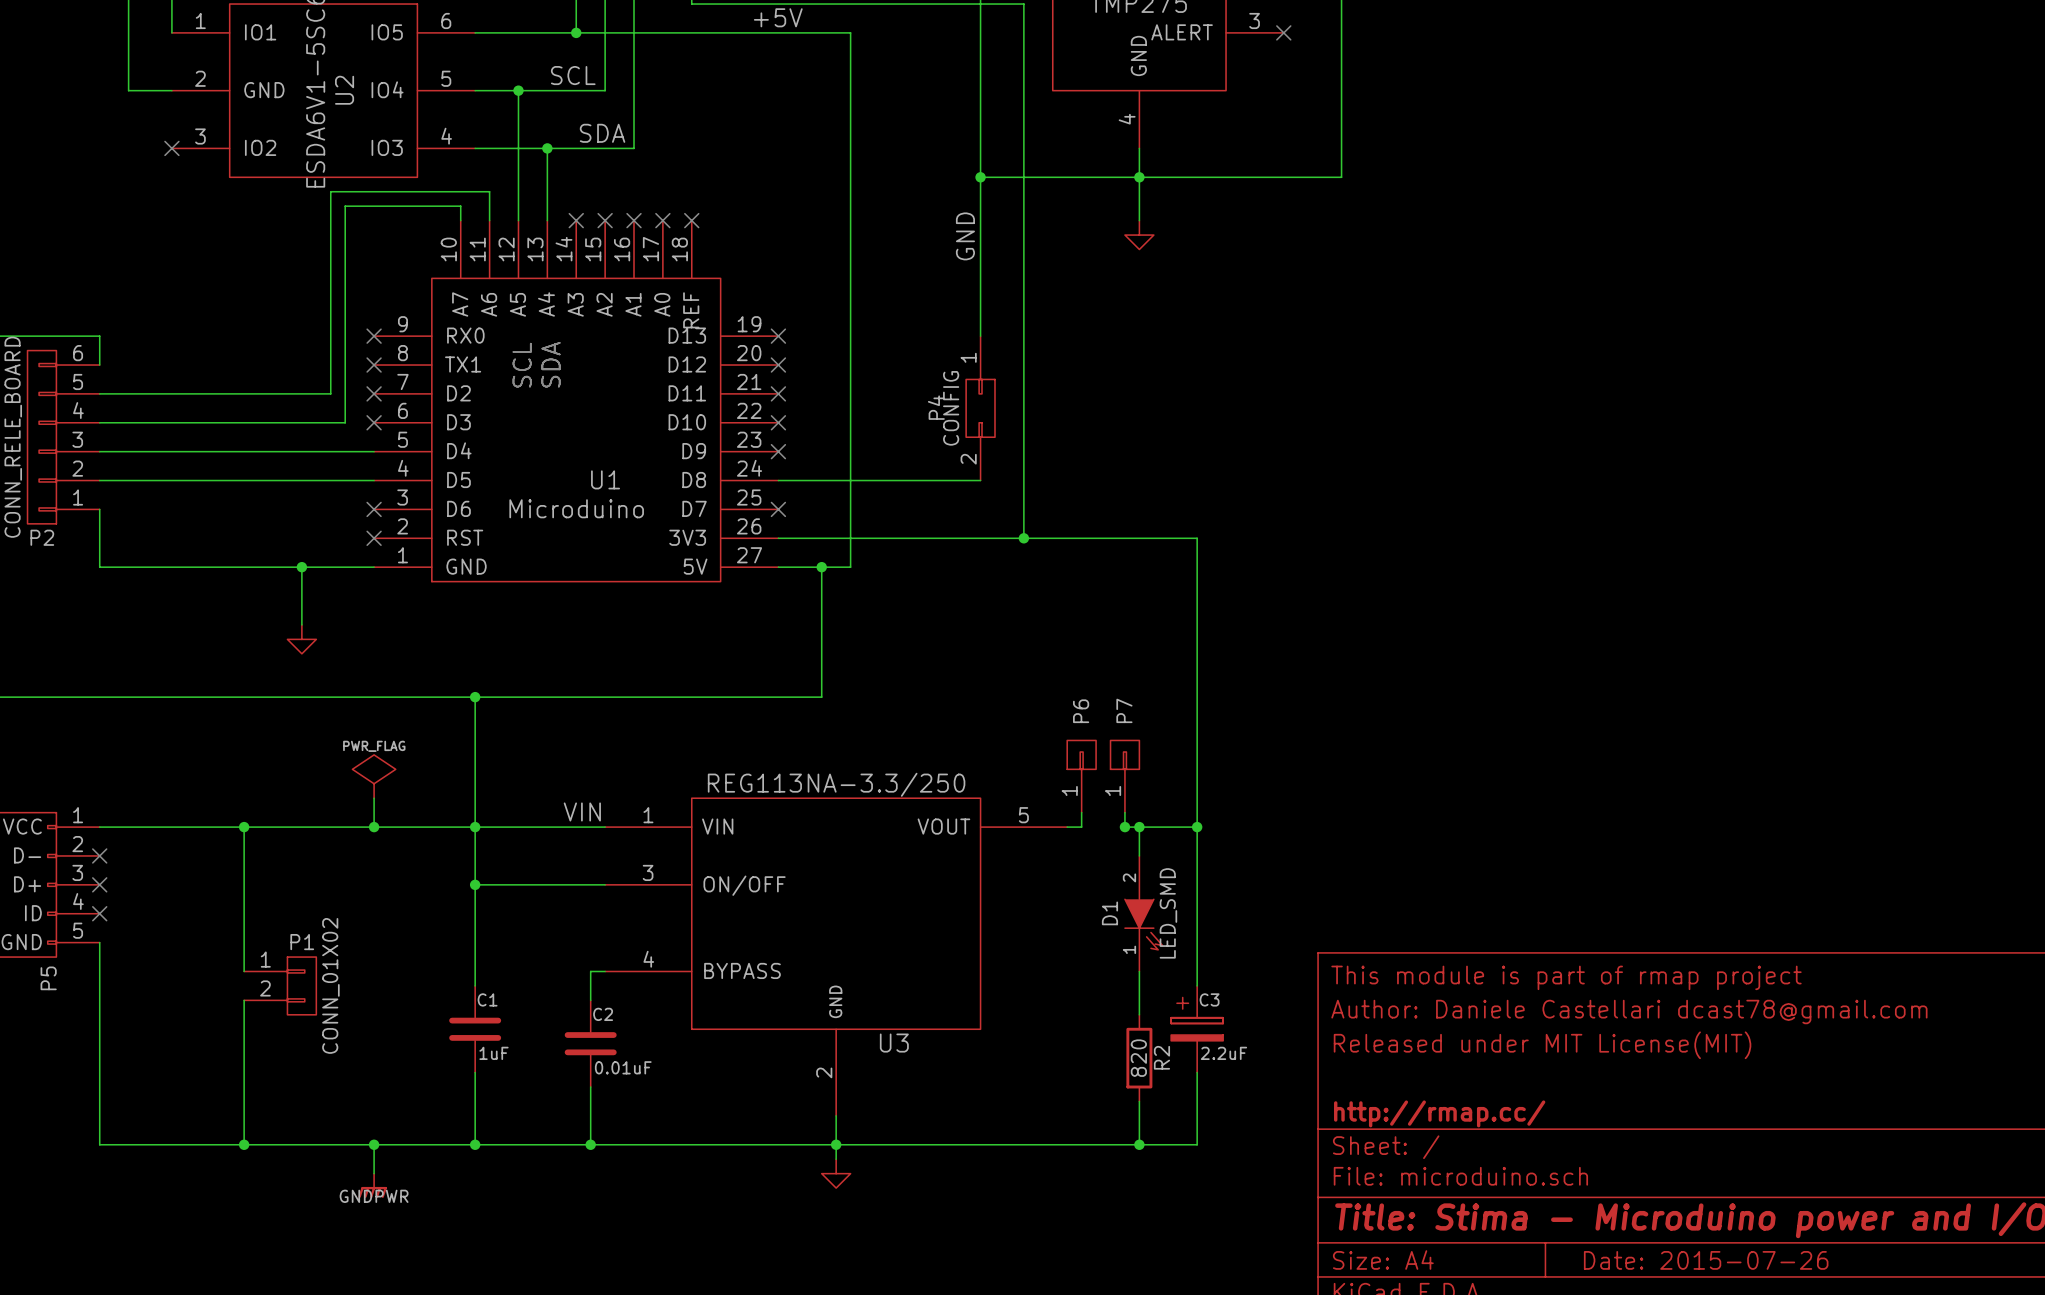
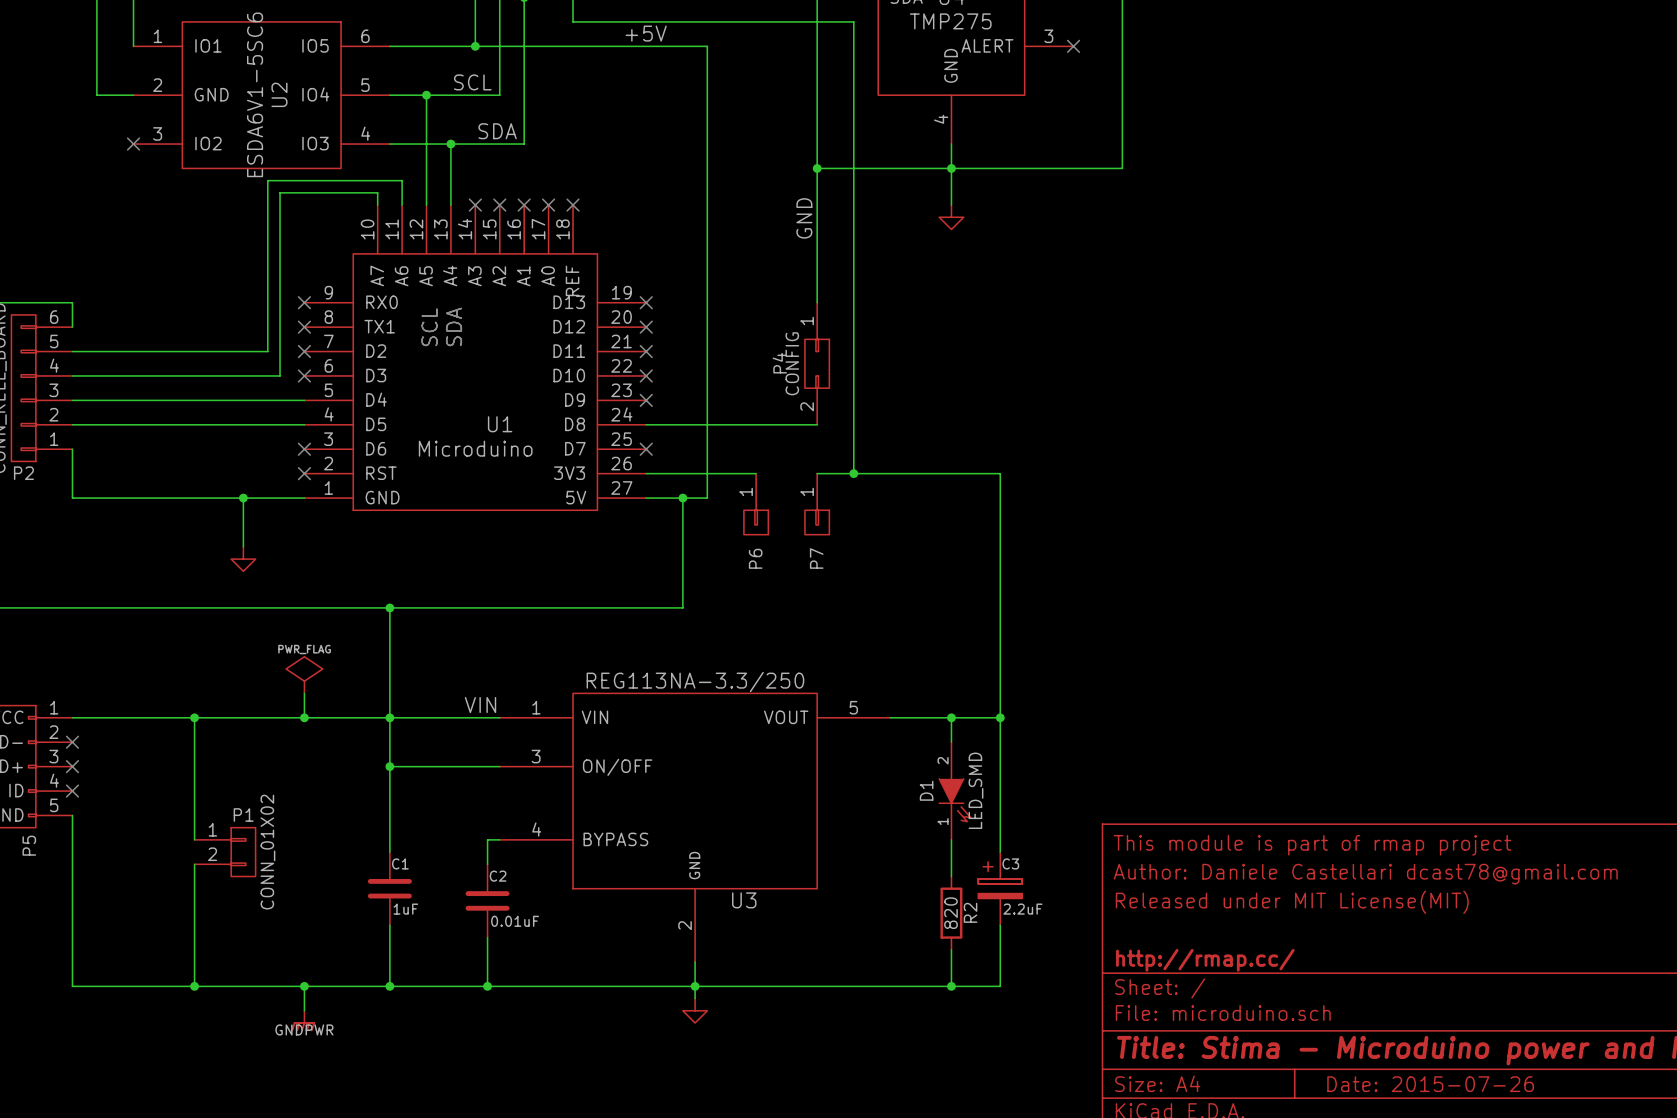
wire: (908, 538) (980, 538) -> none
P6 rotation: 0° (1081, 754) -> 180° (756, 522)
P7 rotation: 0° (1124, 754) -> 180° (817, 522)
P6 position: (1081, 776) -> (756, 504)
P7 position: (1124, 776) -> (817, 504)
wire: (1081, 812) (1081, 827) -> (939, 717) (902, 717)
wire: (1124, 812) (1124, 827) -> none
junction: (1124, 827) -> none

